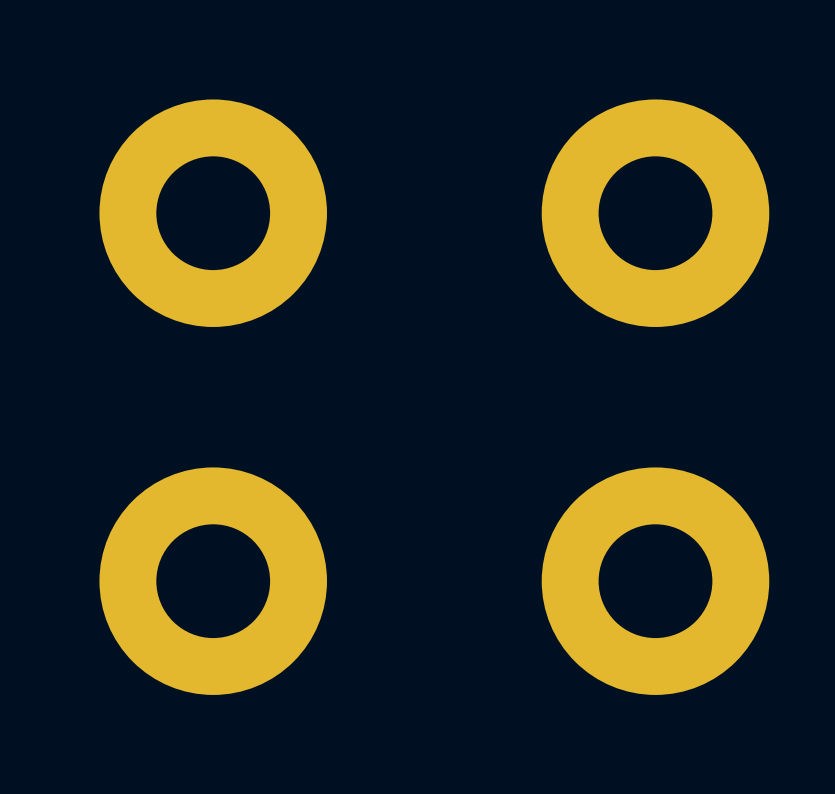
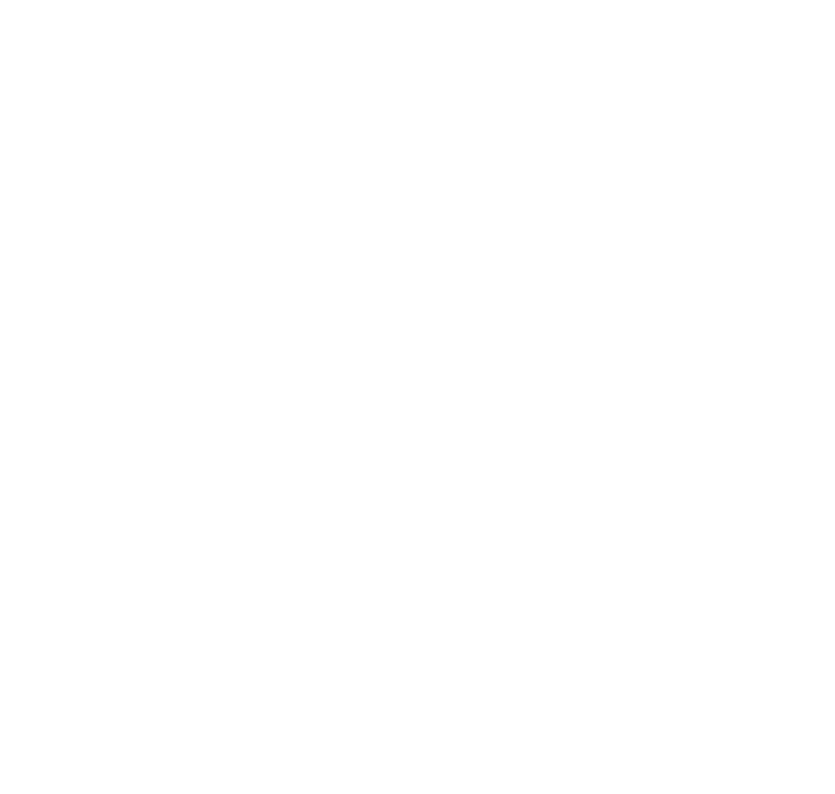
part: (213, 213) -> none
part: (655, 213) -> none
part: (213, 581) -> none
part: (655, 581) -> none

